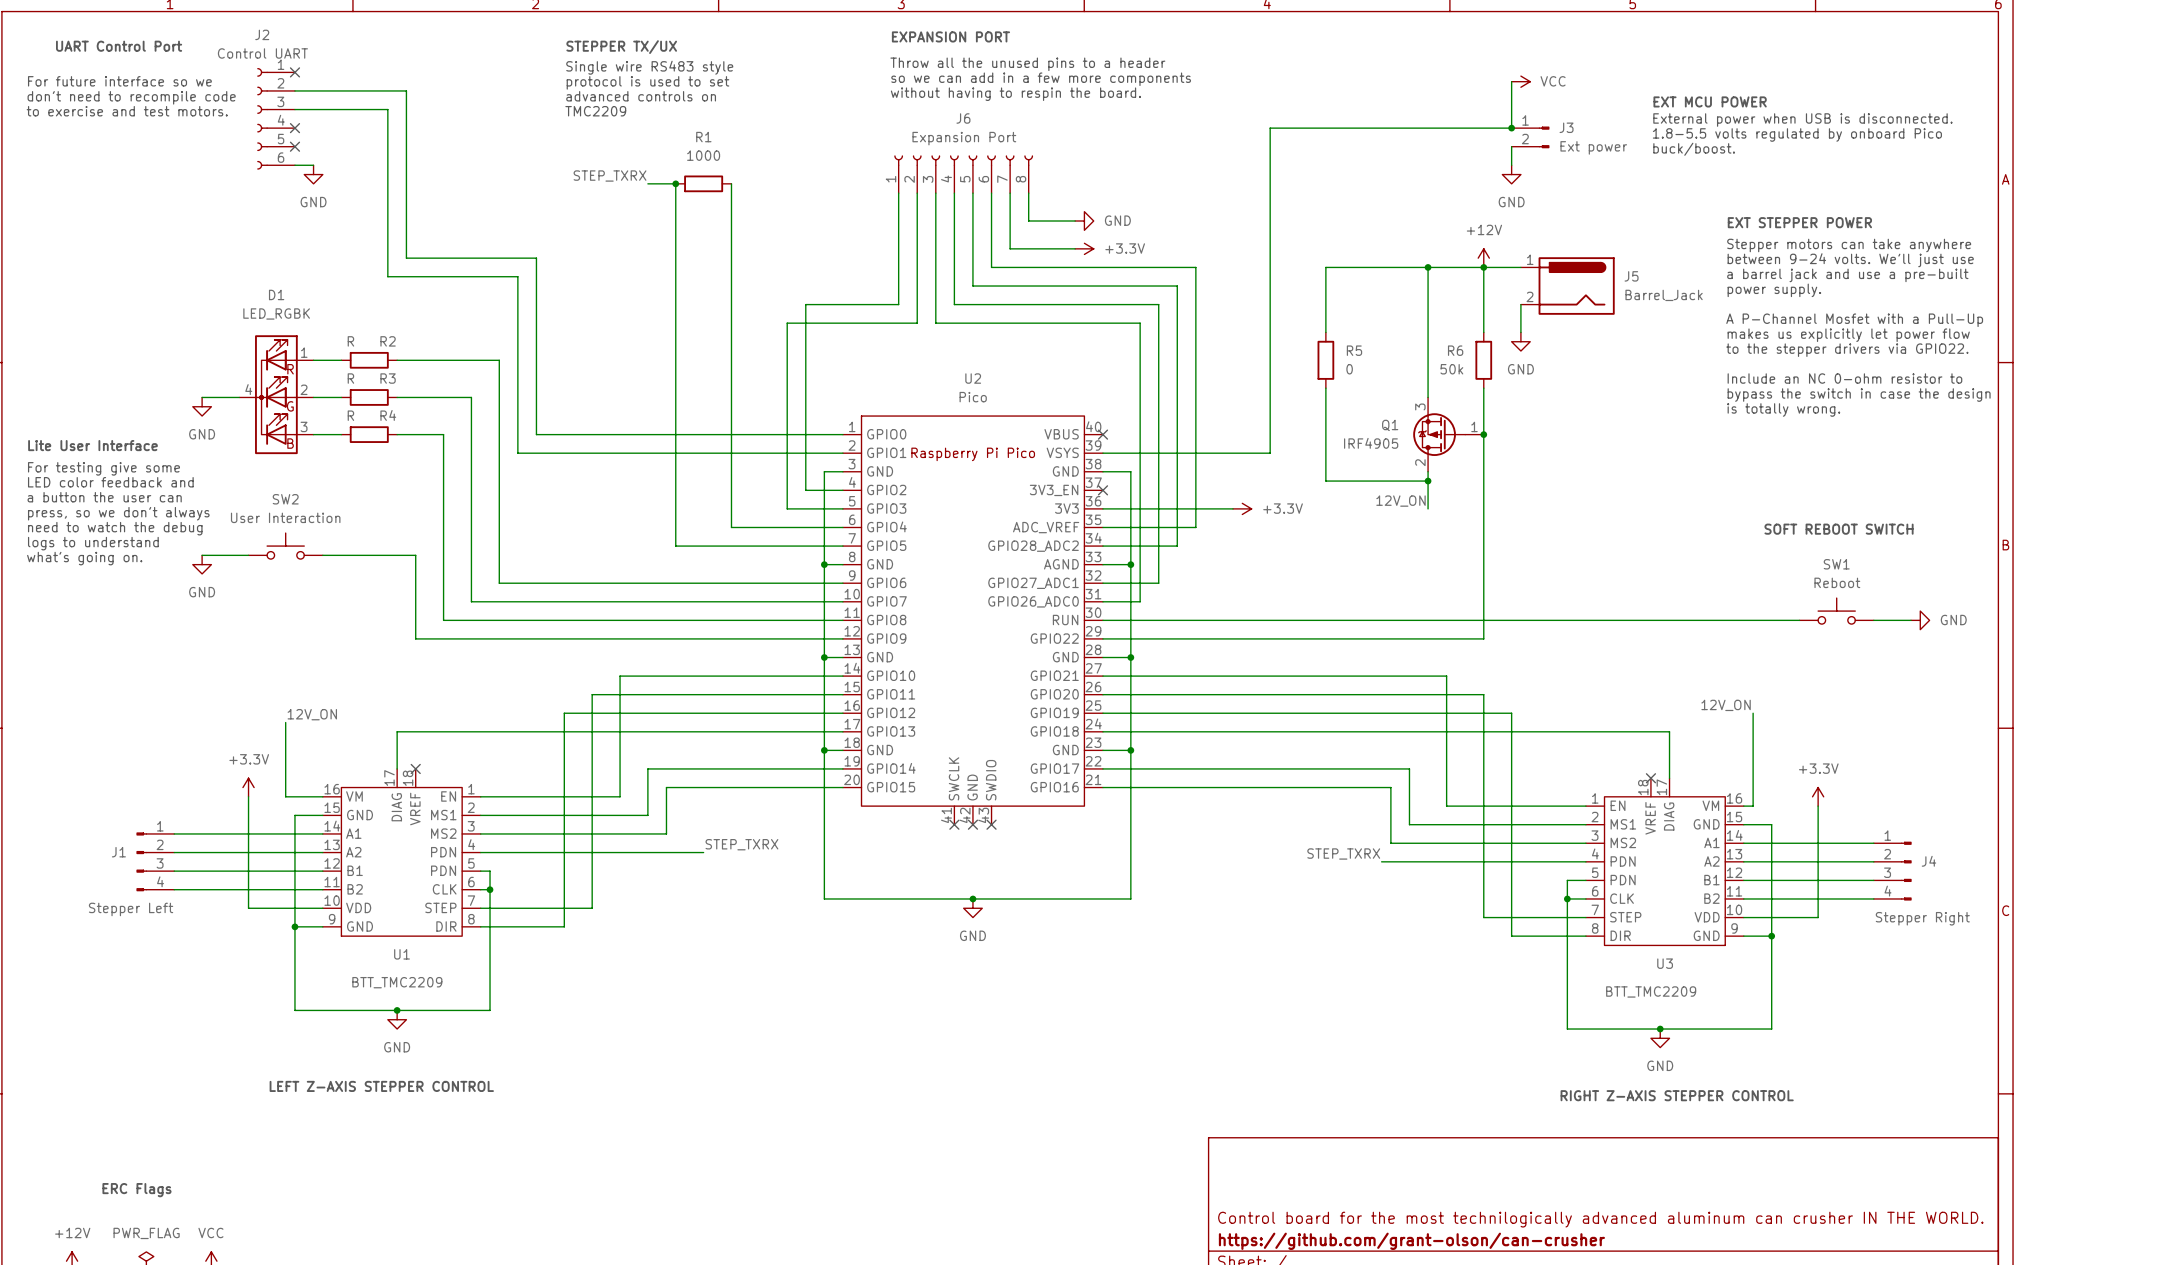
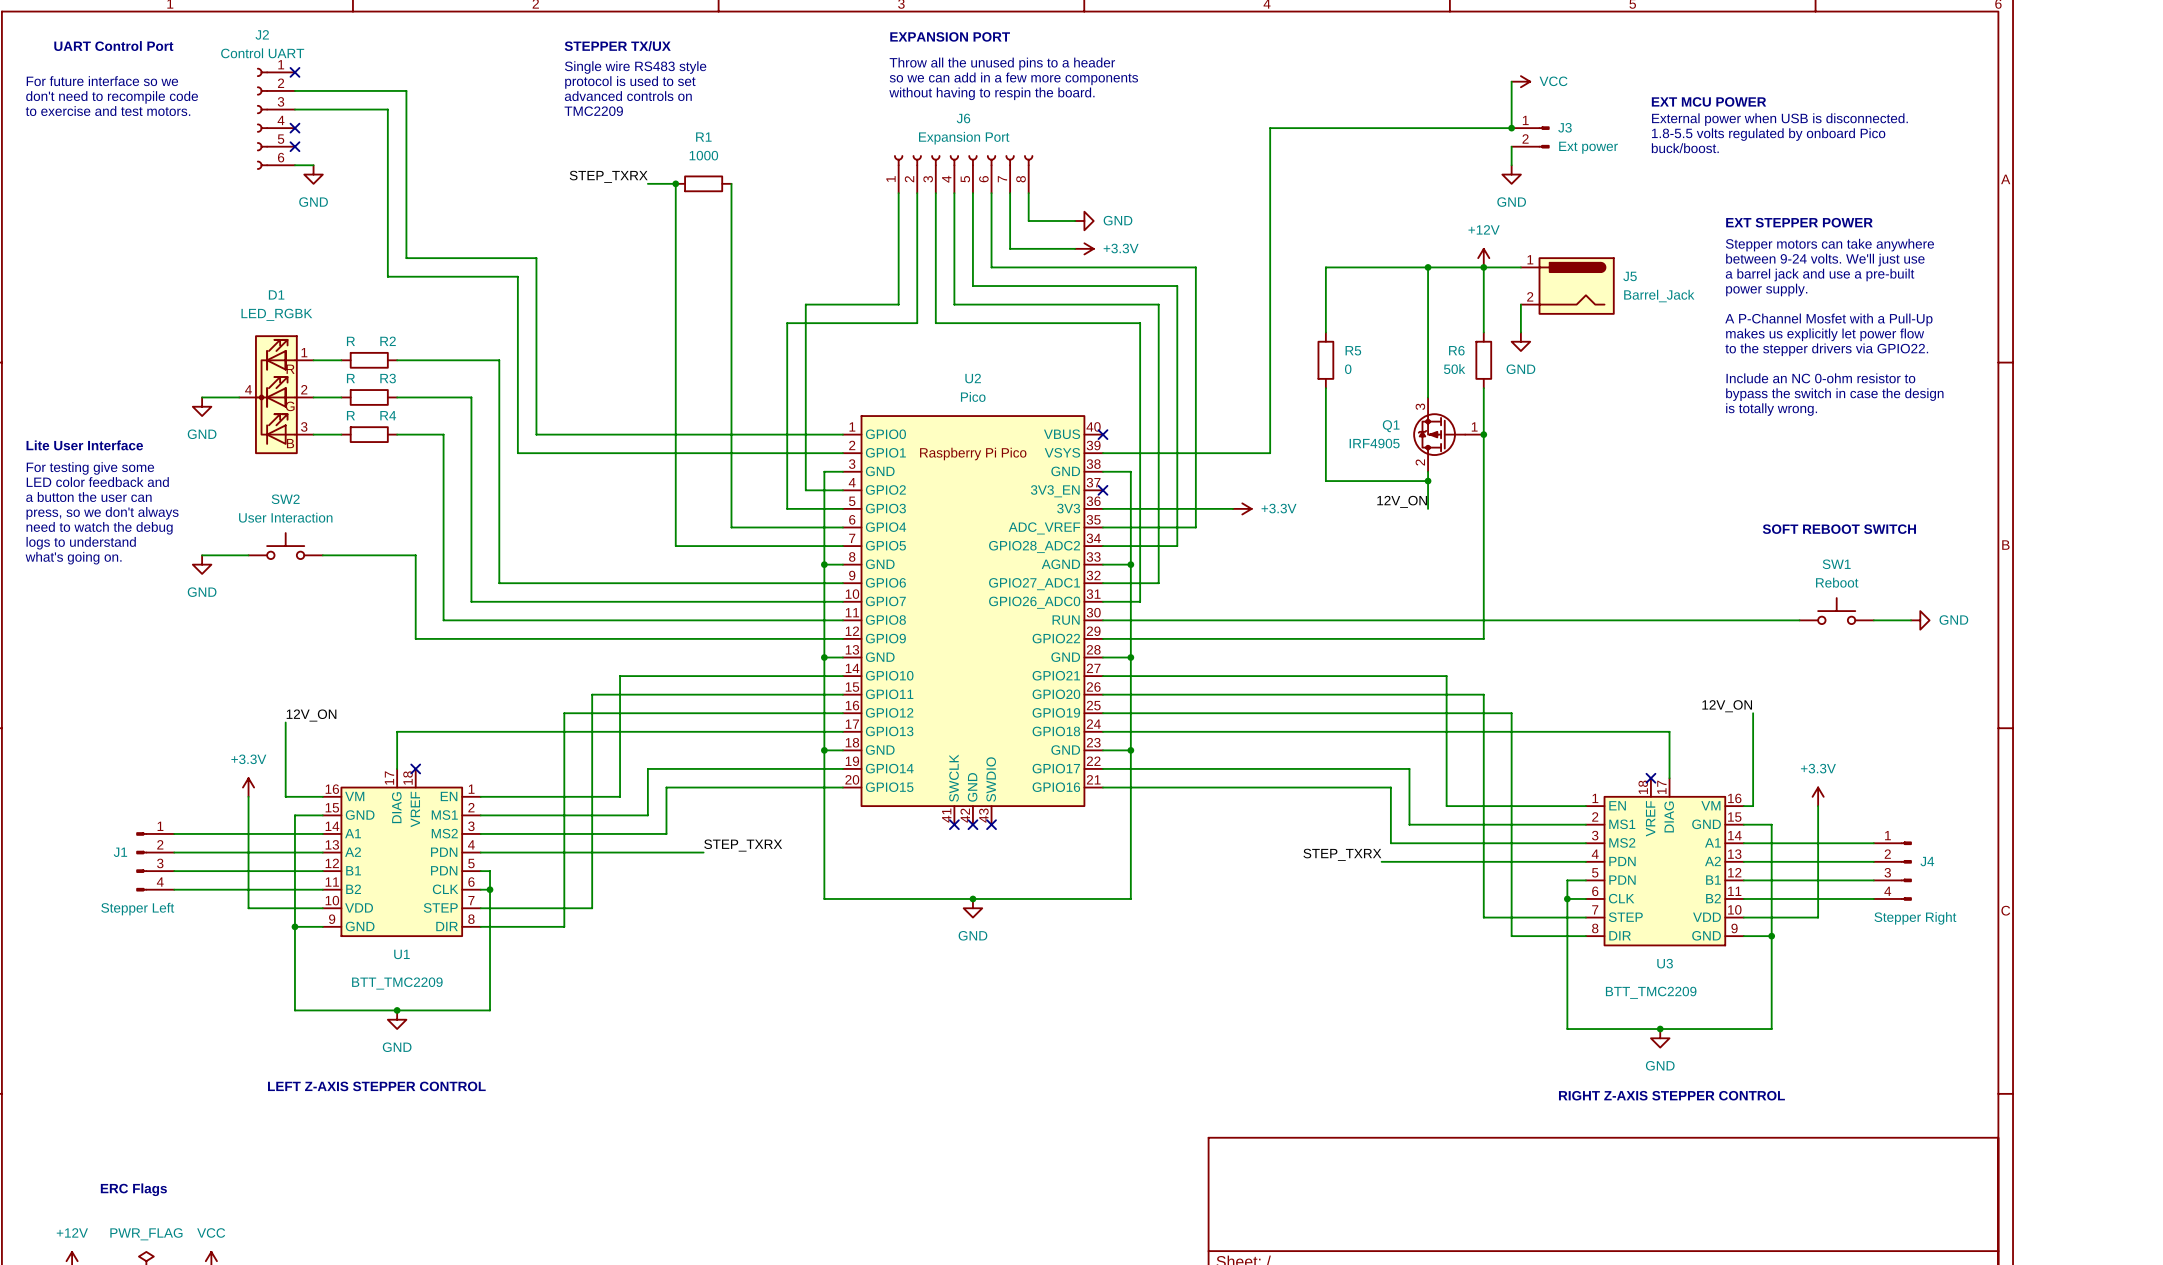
title block: Control board for the most technilogically advanced aluminum can crusher IN THE WORLD. (1600, 1219) -> none
title block: https://github.com/grant-olson/can-crusher (1411, 1241) -> none

